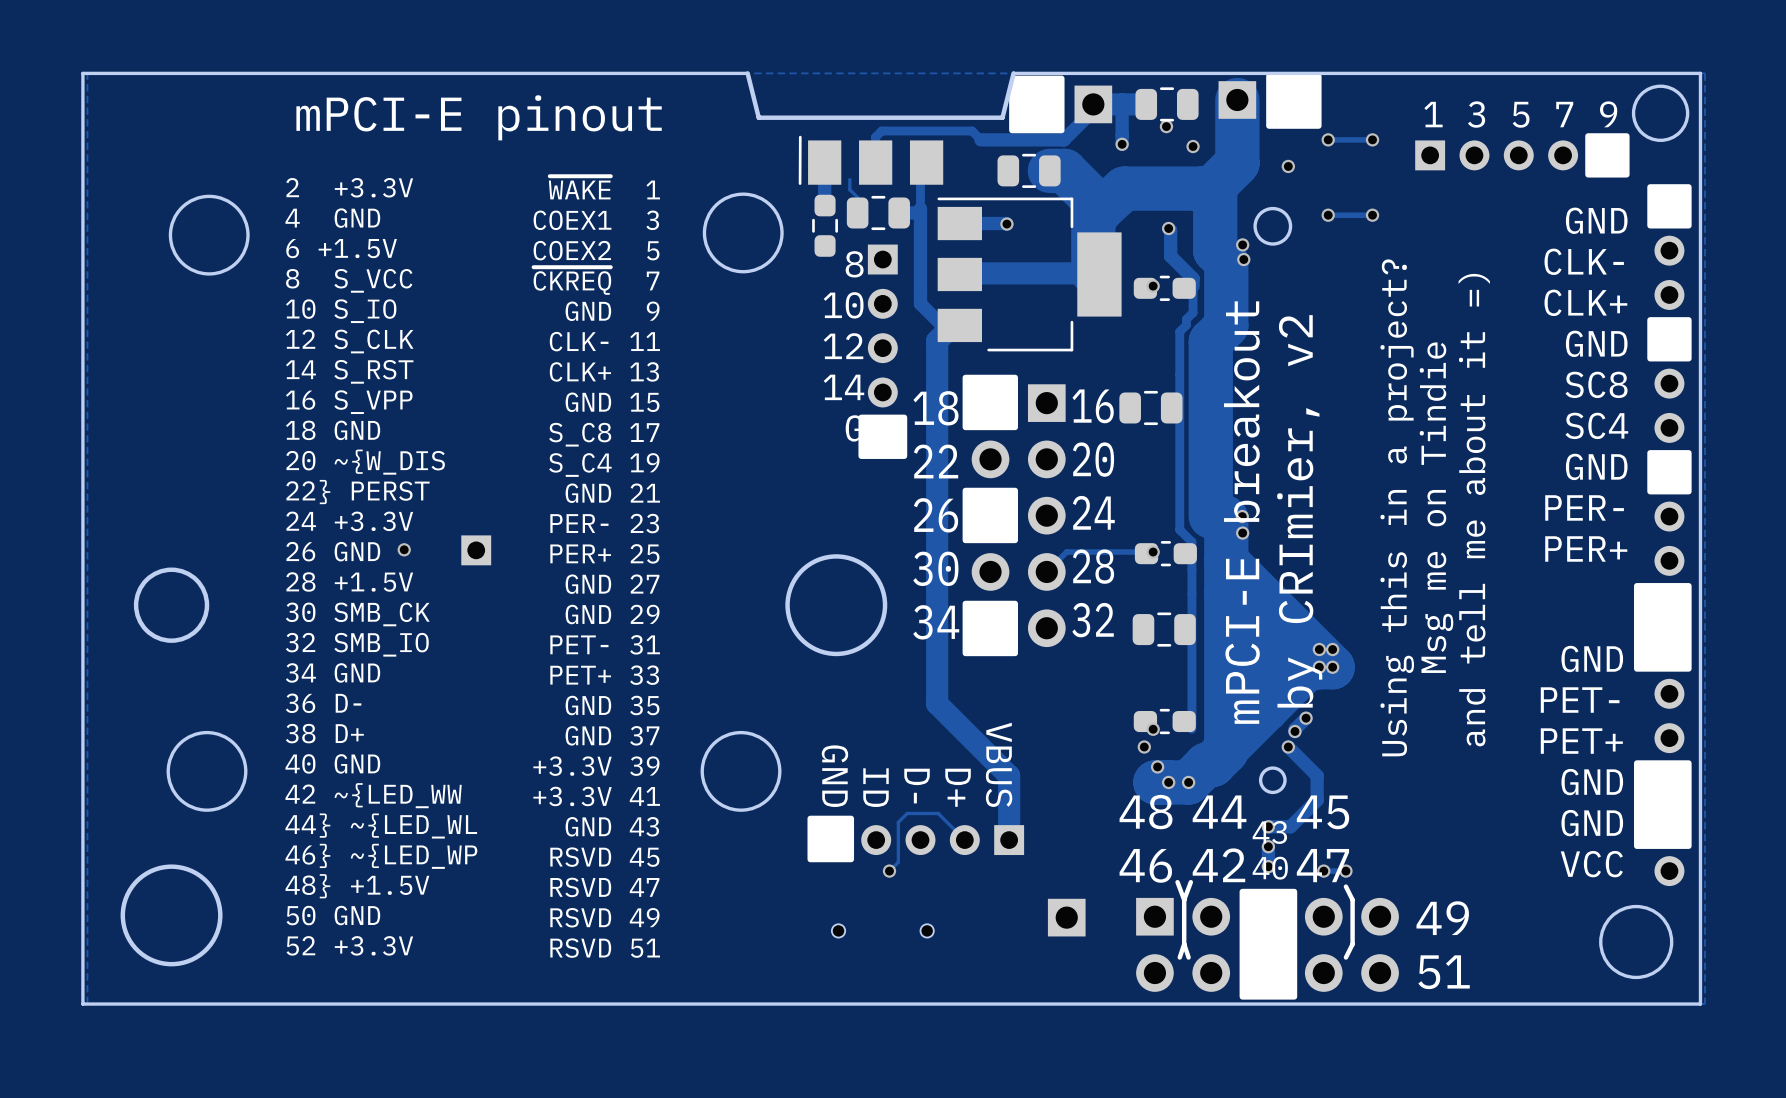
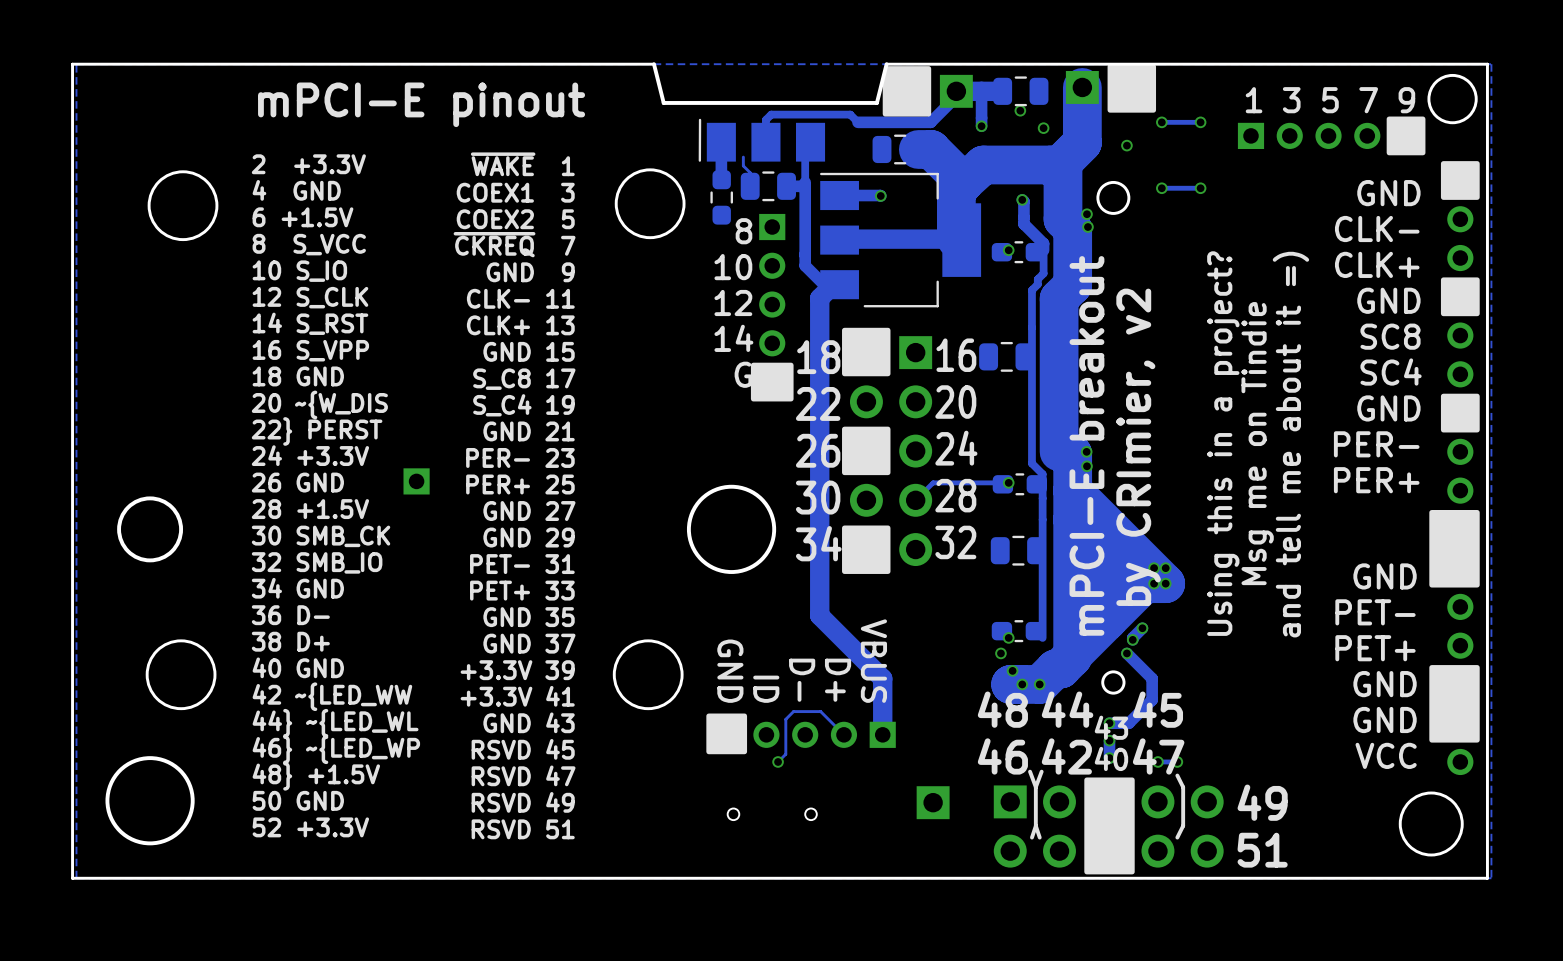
via: (404, 549) -> none

